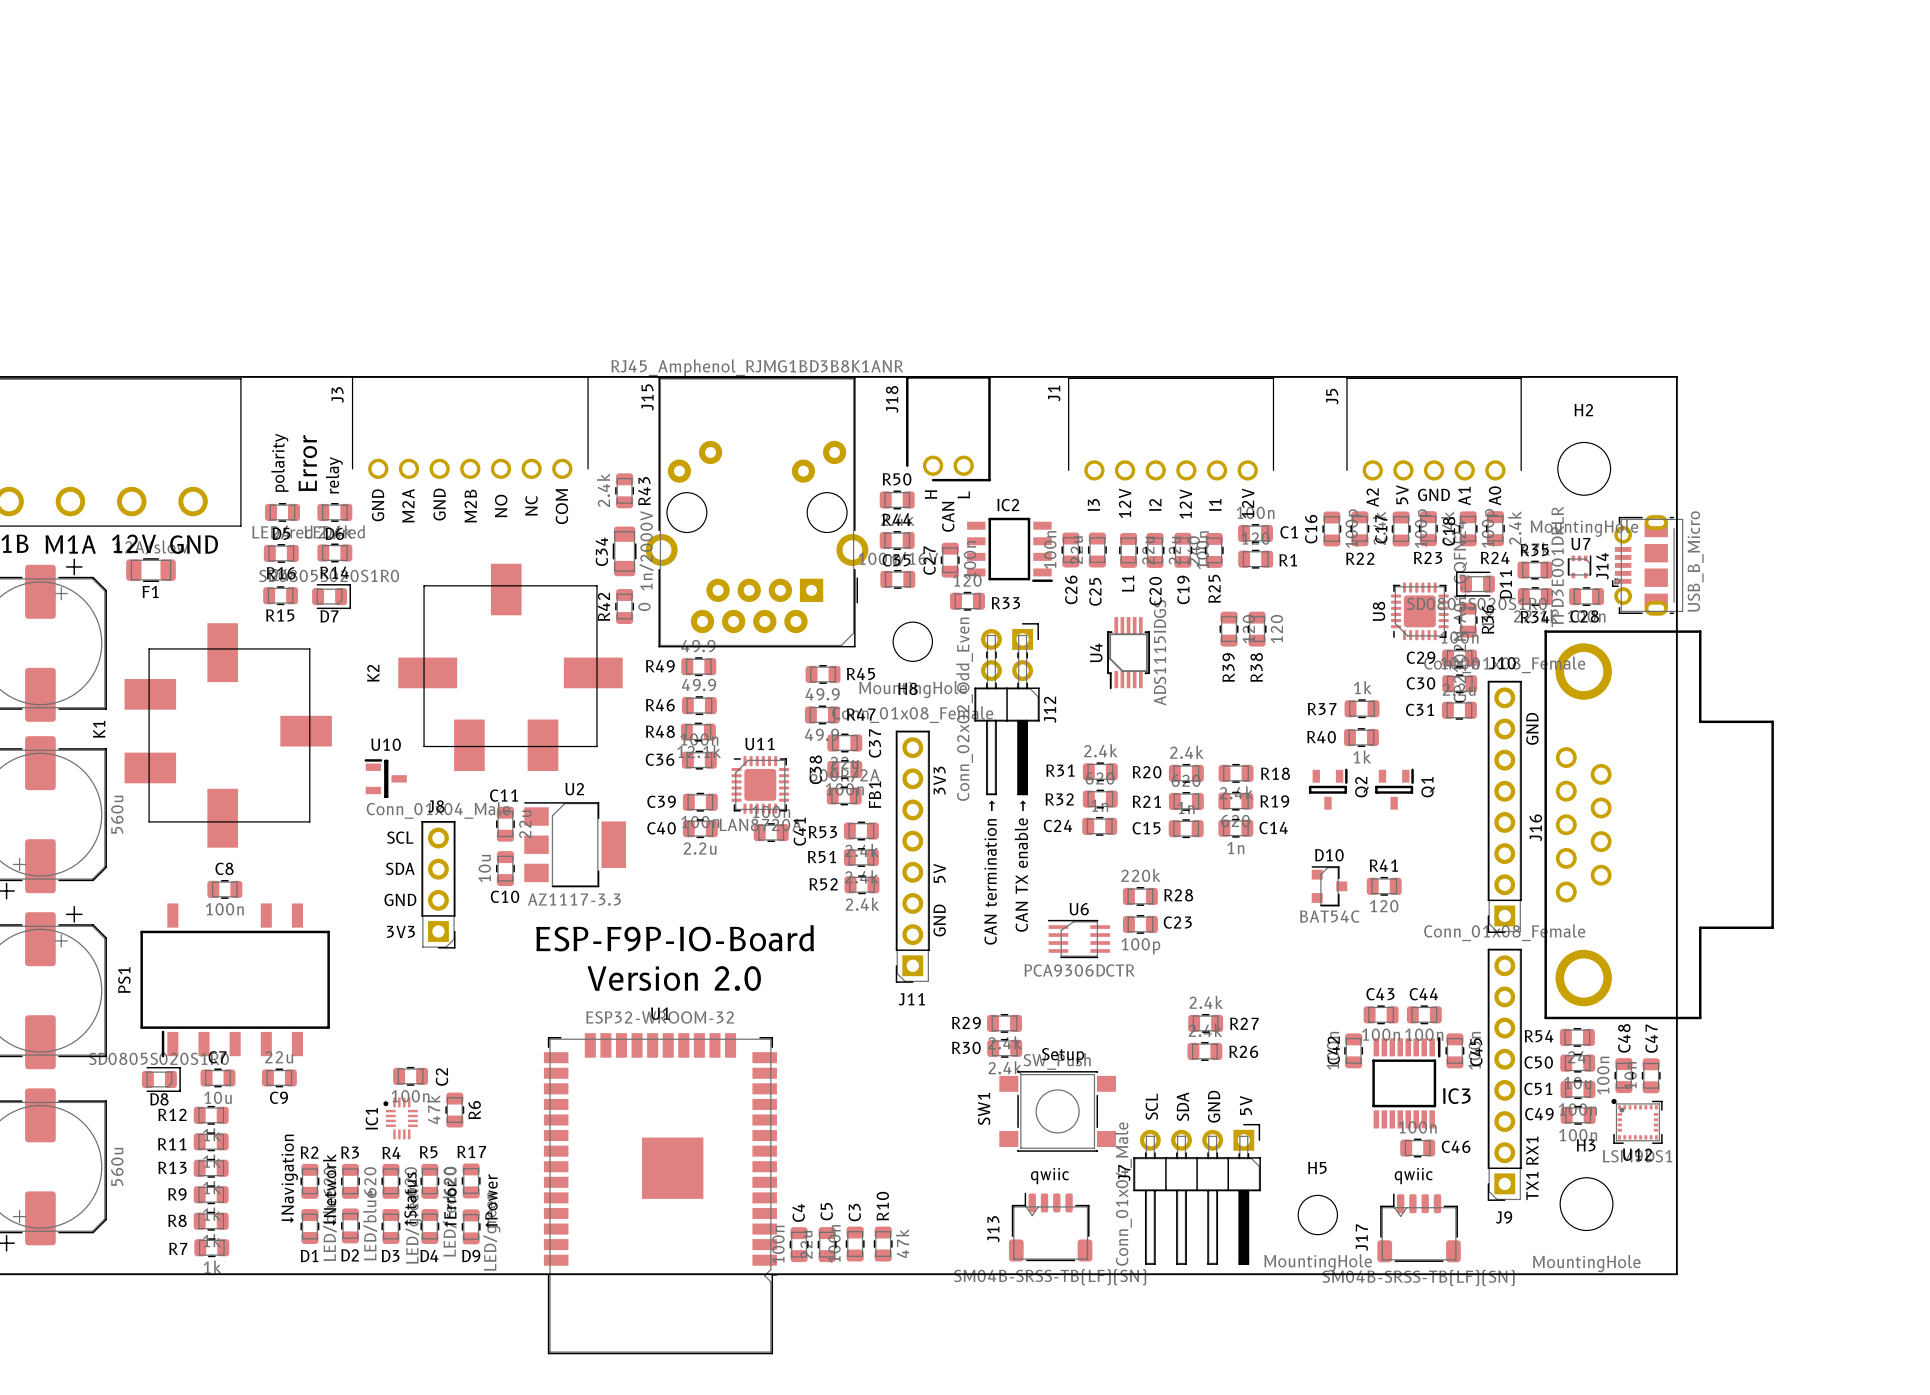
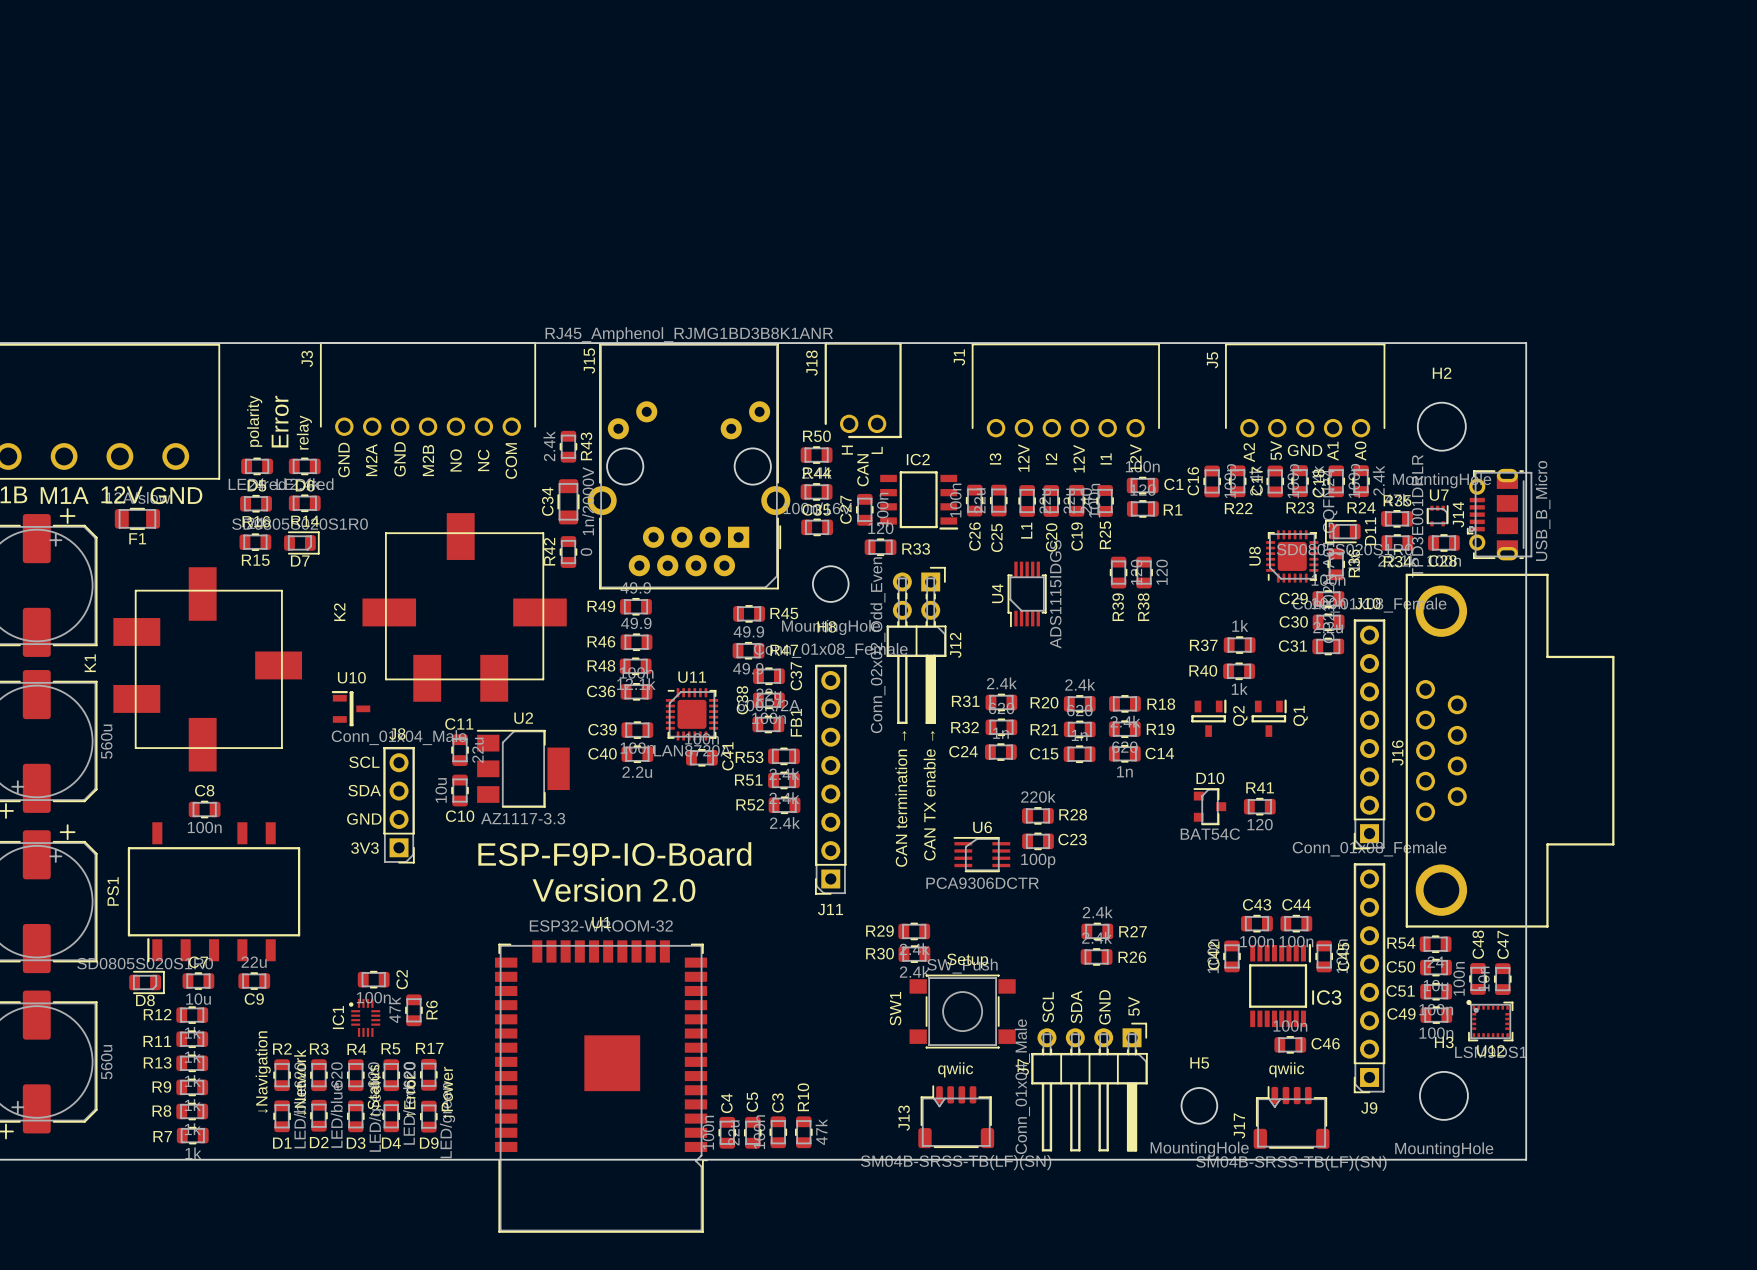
text: GND (1532, 728) -> none
text: 3V3 (939, 780) -> none
text: 5V (939, 873) -> none
text: GND (939, 920) -> none
text: RX1 (1532, 1150) -> none
text: TX1 (1532, 1186) -> none

